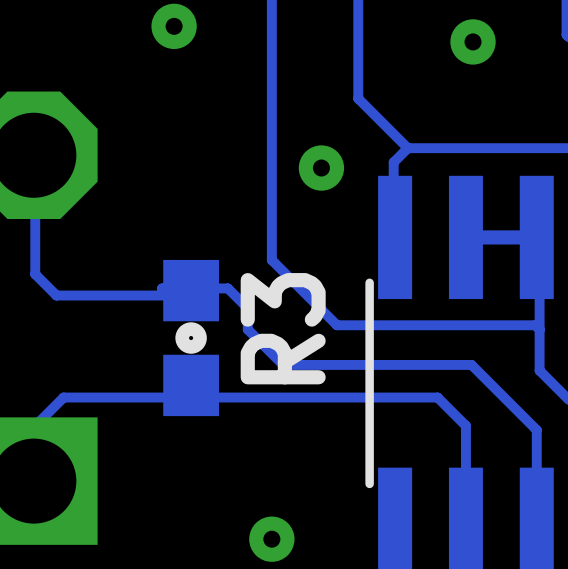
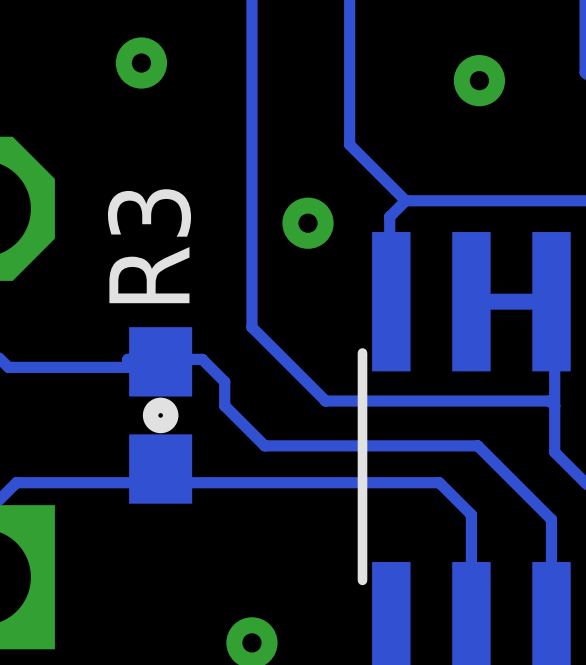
R3 name position: R3 (283, 328) -> R3 (149, 246)

